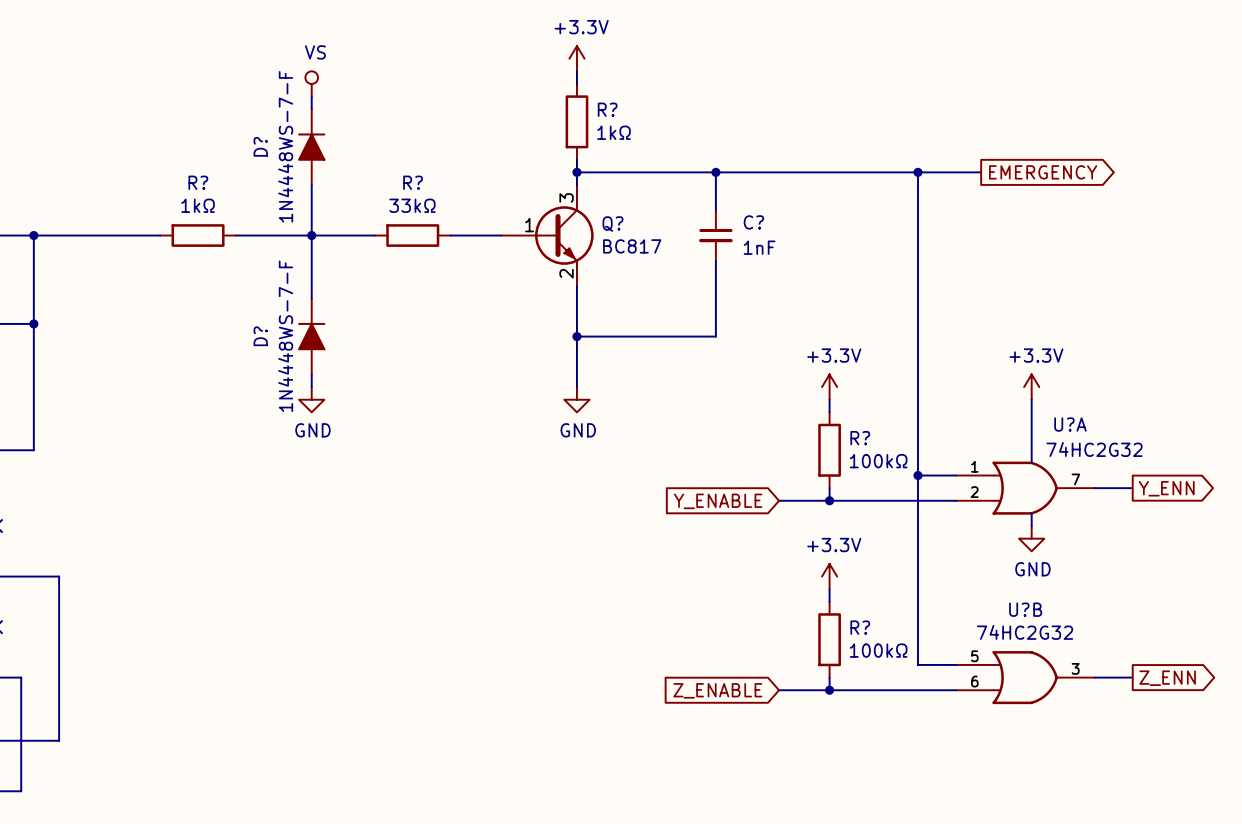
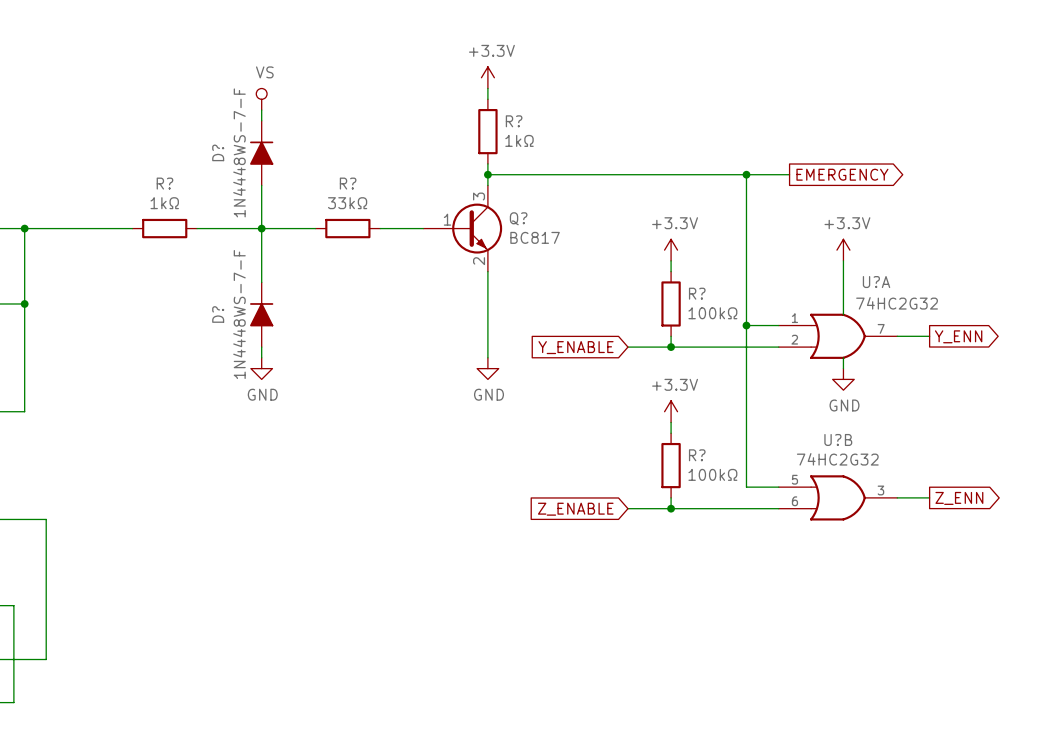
wire: (715, 172) (715, 210) -> none
junction: (715, 172) -> none
wire: none -> (746, 174) (746, 487) (778, 487)
wire: (918, 172) (918, 664) (955, 664) -> none
junction position: (918, 172) -> (746, 174)
wire: (930, 172) (981, 172) -> none
global label position: EMERGENCY (1043, 172) -> EMERGENCY (842, 174)
C?: 1nF (715, 235) -> none
wire: (715, 260) (715, 336) (576, 336) -> none
power symbol: none -> +3.3V (671, 250)
power symbol: none -> +3.3V (843, 250)
R?: none -> 100kΩ (671, 303)
junction: (576, 336) -> none
junction: none -> (746, 325)
junction: none -> (671, 347)
power symbol: +3.3V (829, 387) -> none
power symbol: +3.3V (1031, 387) -> none
wire: (829, 399) (829, 412) -> (671, 260) (671, 271)
wire: (1031, 399) (1031, 462) -> (843, 260) (843, 314)
power symbol: none -> +3.3V (671, 411)
R?: 100kΩ (829, 450) -> none
wire: (918, 475) (955, 475) -> (746, 325) (778, 325)
junction: (918, 475) -> none
wire: (829, 488) (829, 500) -> (671, 336) (671, 347)
U?A position: (1025, 488) -> (838, 336)
wire: (1094, 488) (1132, 488) -> (897, 336) (929, 336)
global label position: Y_ENN (1166, 488) -> Y_ENN (958, 336)
wire: (779, 500) (955, 500) -> (627, 347) (778, 347)
junction: (829, 500) -> none
global label position: Y_ENABLE (718, 501) -> Y_ENABLE (576, 347)
R?: none -> 100kΩ (671, 465)
wire: (1031, 513) (1031, 526) -> (843, 357) (843, 368)
power symbol position: GND (1031, 538) -> GND (843, 379)
junction: none -> (671, 508)
power symbol: +3.3V (829, 576) -> none
wire: (829, 589) (829, 601) -> (671, 422) (671, 433)
R?: 100kΩ (829, 639) -> none
wire: (829, 677) (829, 690) -> (671, 497) (671, 508)
U?B position: (1025, 677) -> (838, 497)
wire: (1094, 677) (1132, 677) -> (897, 497) (929, 497)
global label position: Z_ENN (1167, 678) -> Z_ENN (959, 498)
global label position: Z_ENABLE (717, 690) -> Z_ENABLE (575, 509)
wire: (779, 690) (955, 690) -> (627, 508) (778, 508)
junction: (829, 690) -> none

